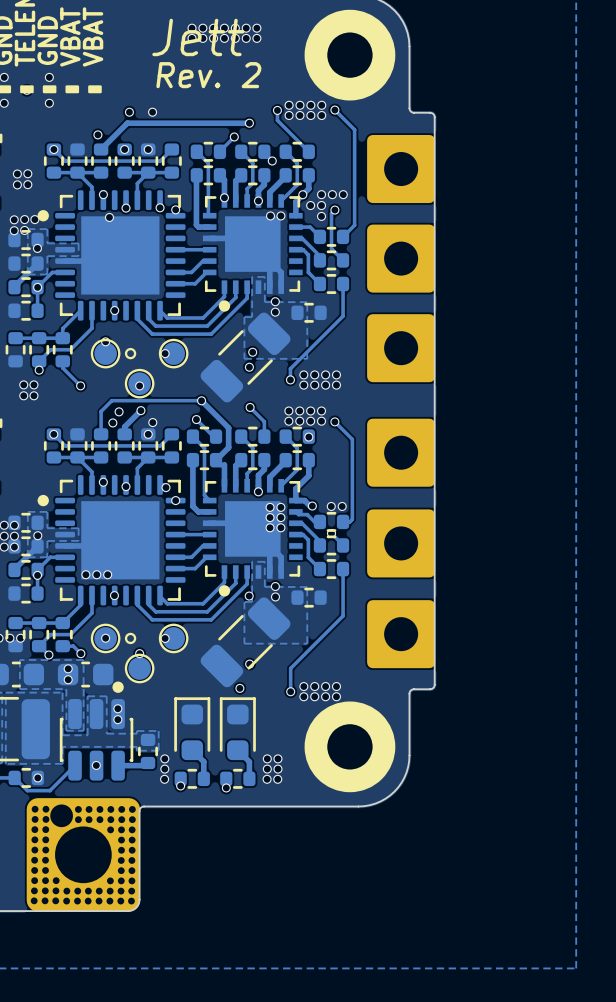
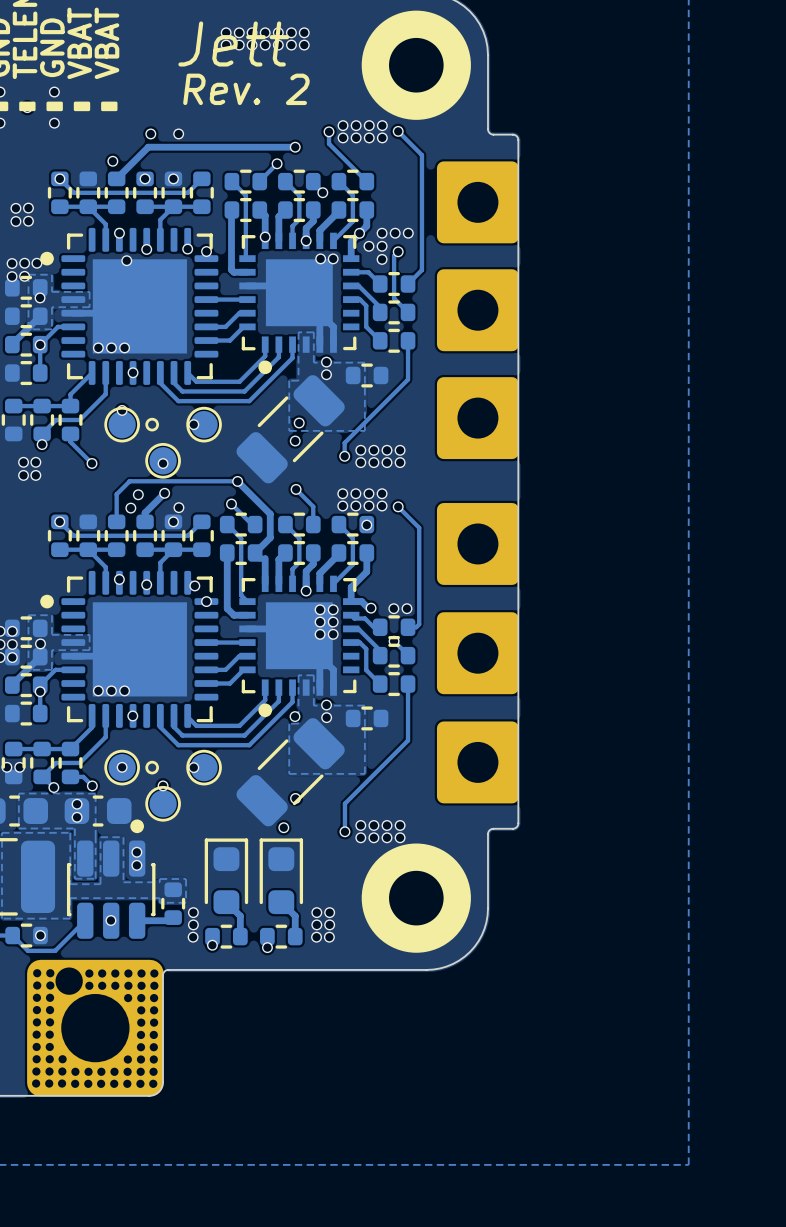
via: none -> (98, 347)
via: none -> (111, 347)
via: none -> (124, 347)

